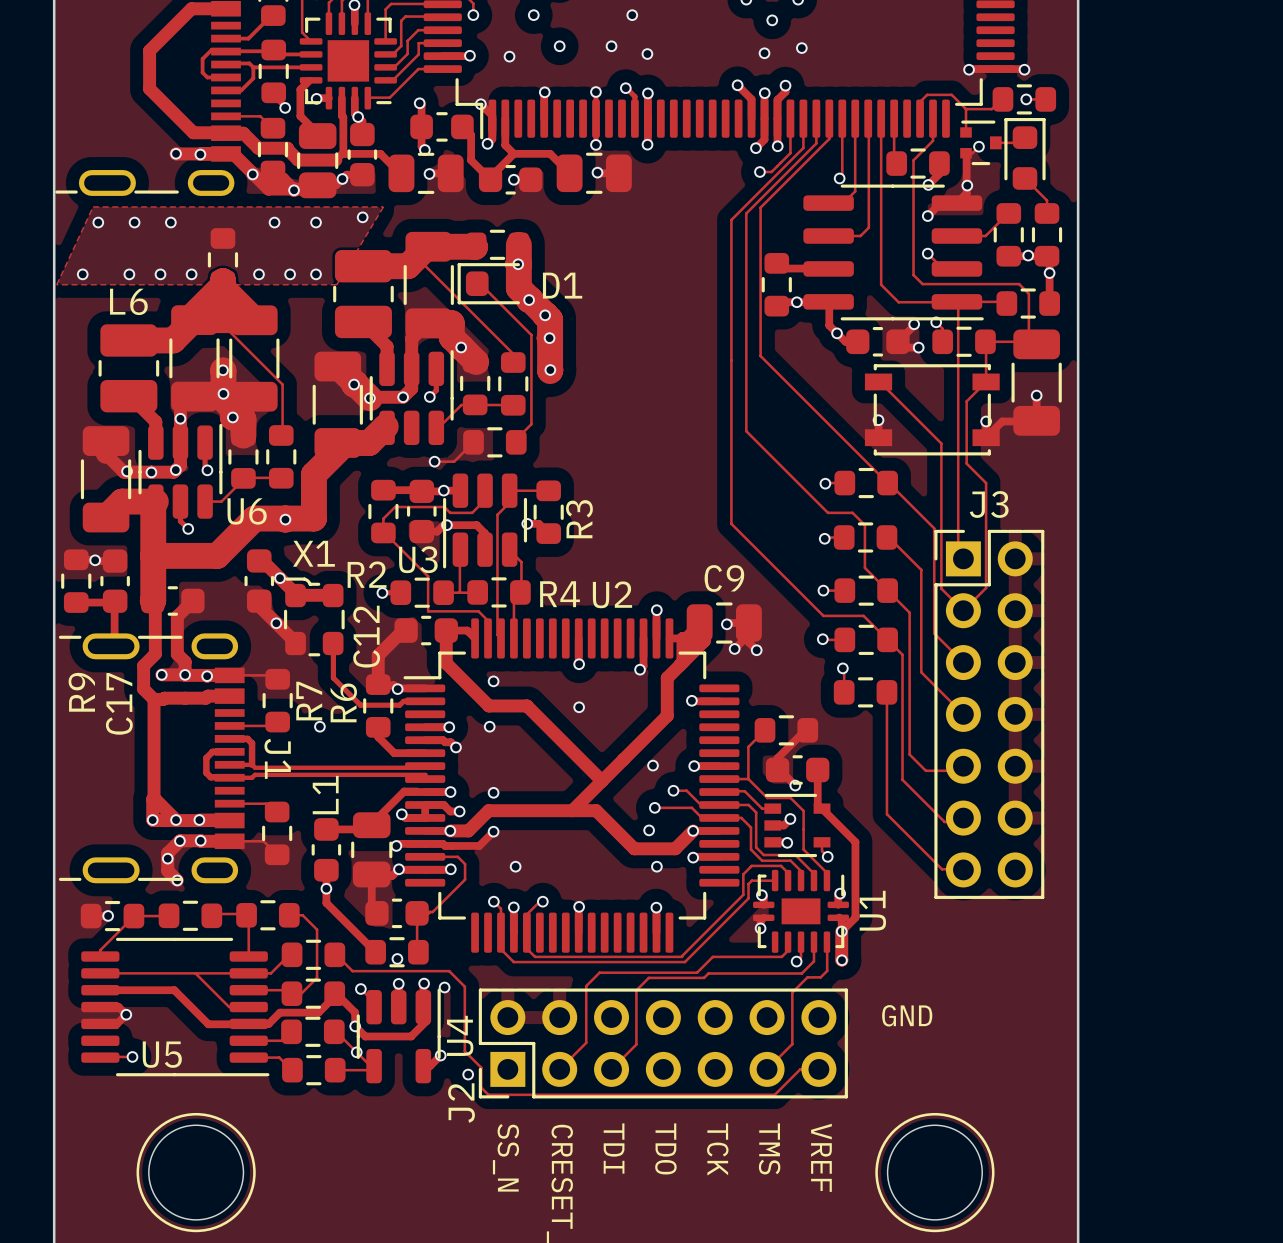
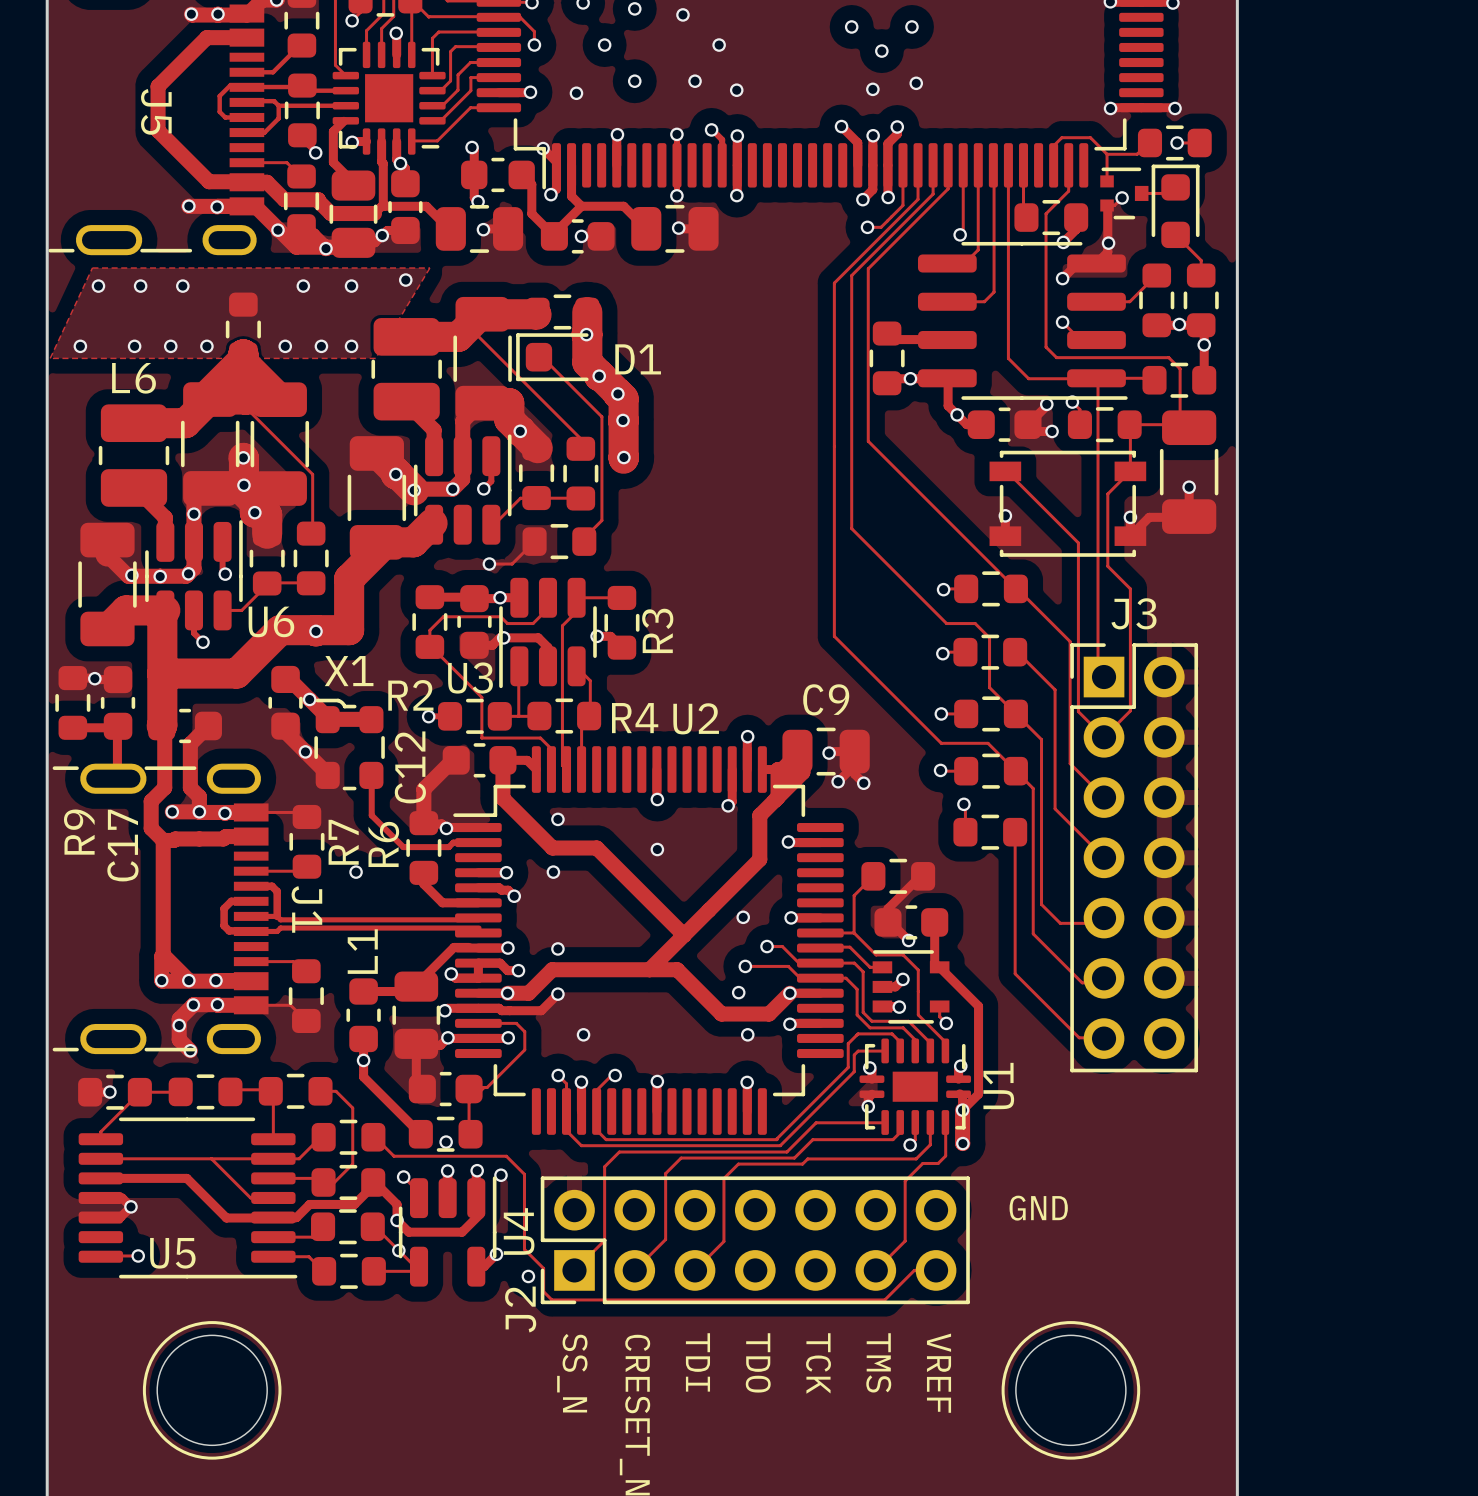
J5 name: none -> J5 (156, 111)
track: none -> (884, 1122) (816, 1122) (786, 1152) (619, 1152) (604, 1166) (604, 1240) (573, 1271)

